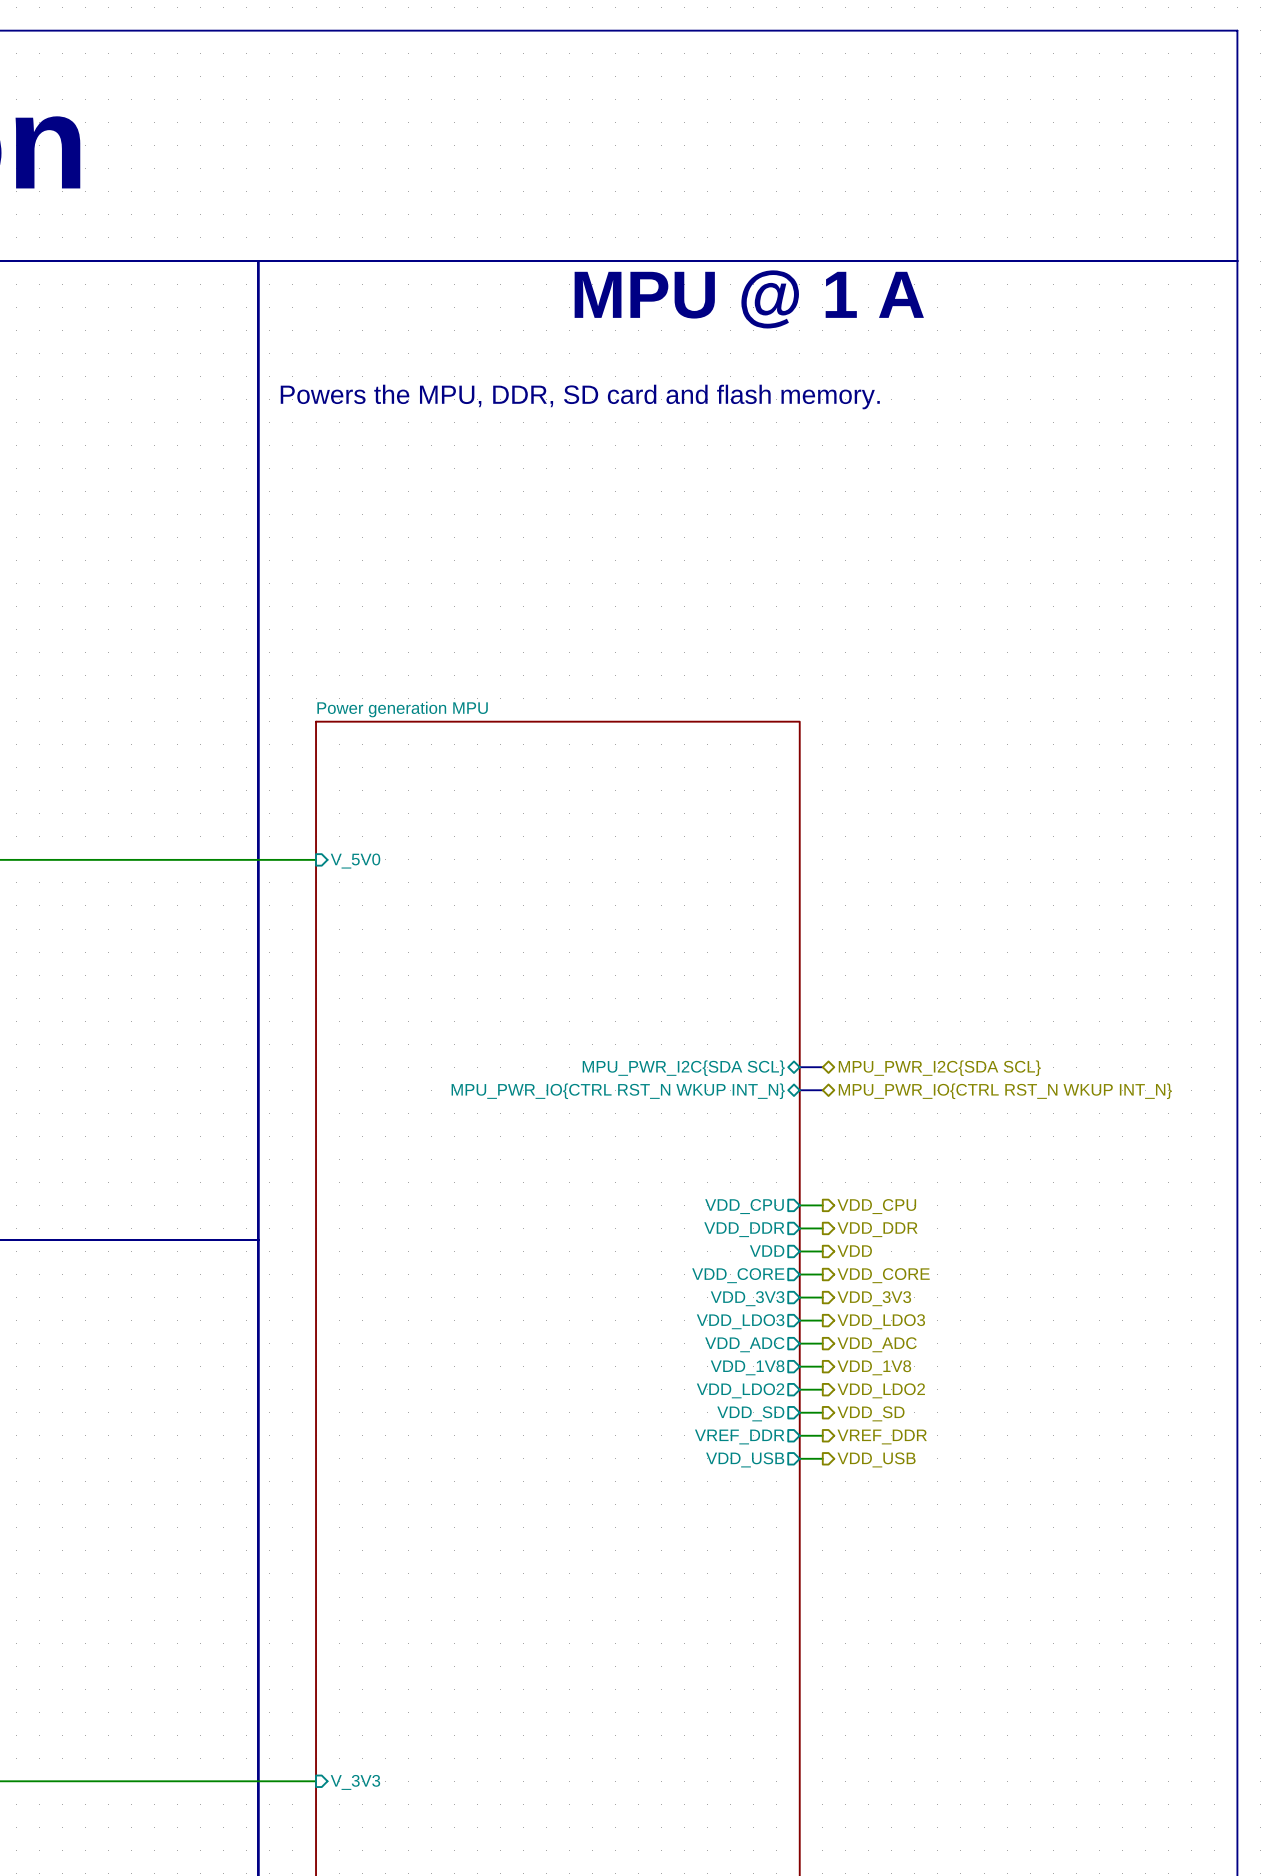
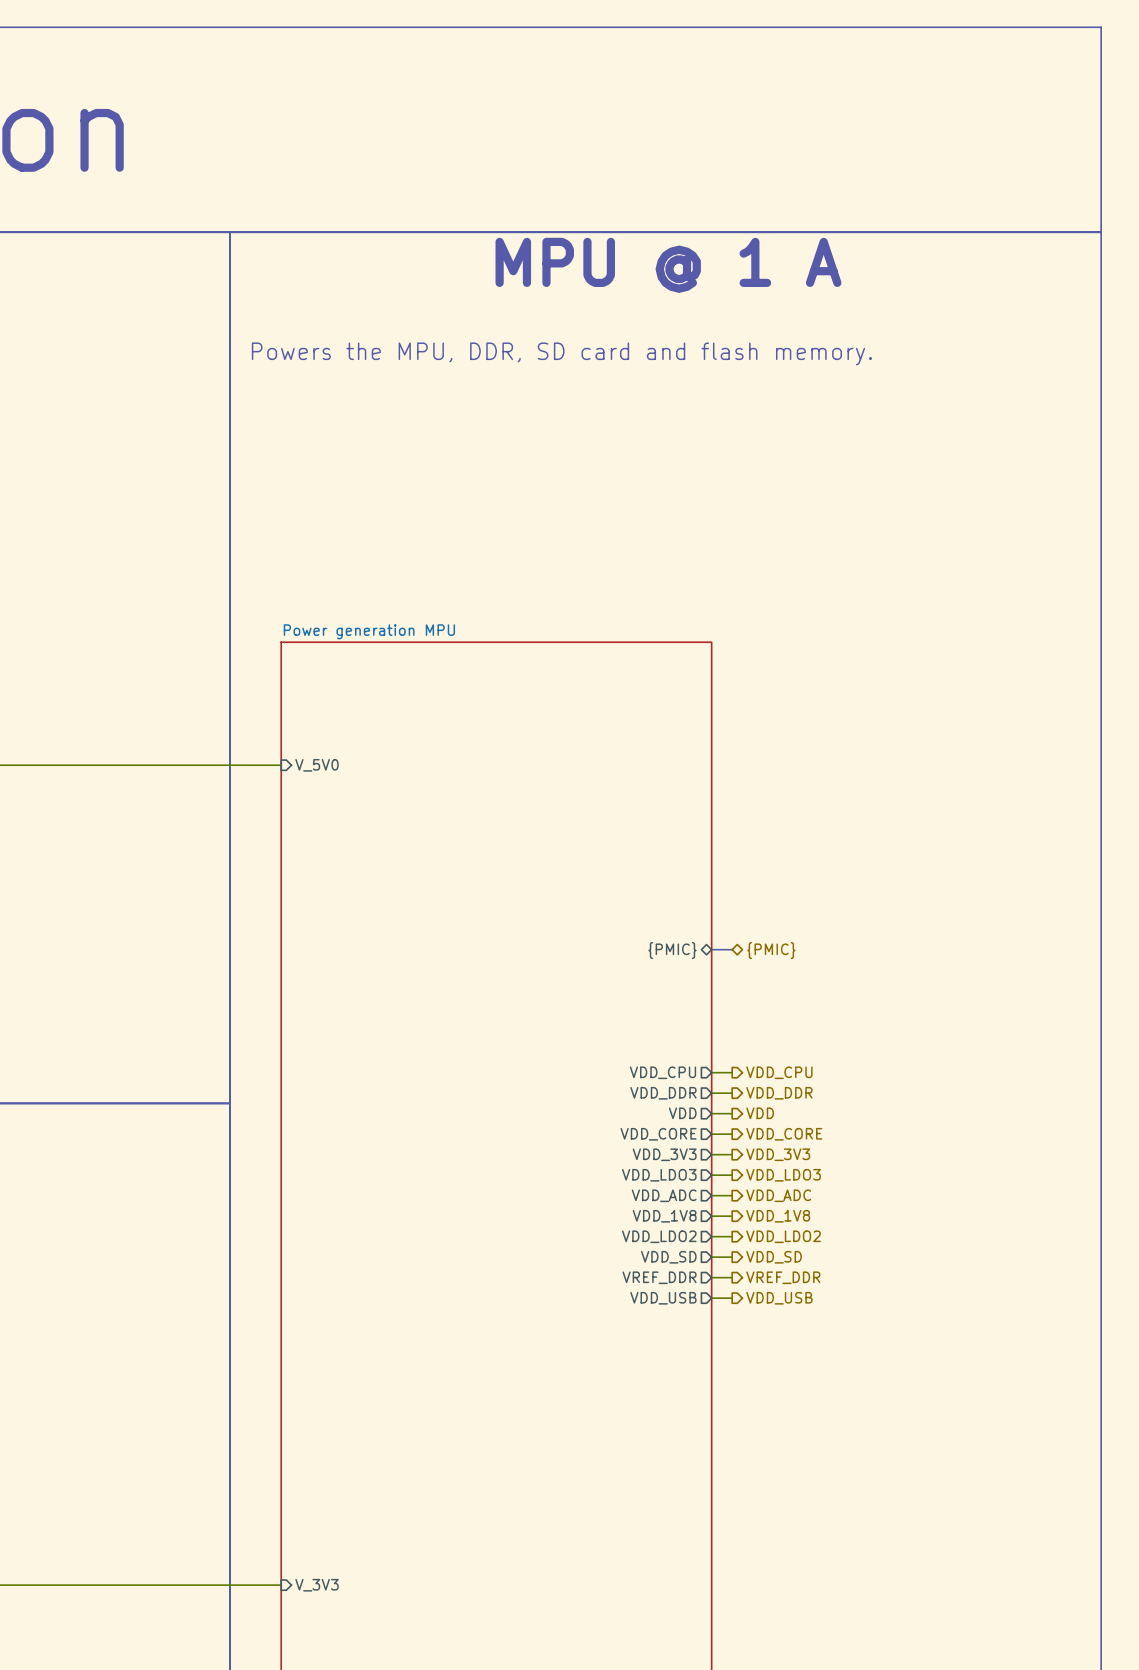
sheet pin: MPU_PWR_I2C{SDA SCL} (683, 1068) -> {PMIC} (672, 950)
hierarchical label: MPU_PWR_I2C{SDA SCL} (939, 1068) -> {PMIC} (771, 950)
bus: (799, 1090) (822, 1090) -> none
sheet pin: MPU_PWR_IO{CTRL RST_N WKUP INT_N} (618, 1091) -> none
hierarchical label: MPU_PWR_IO{CTRL RST_N WKUP INT_N} (1005, 1091) -> none

